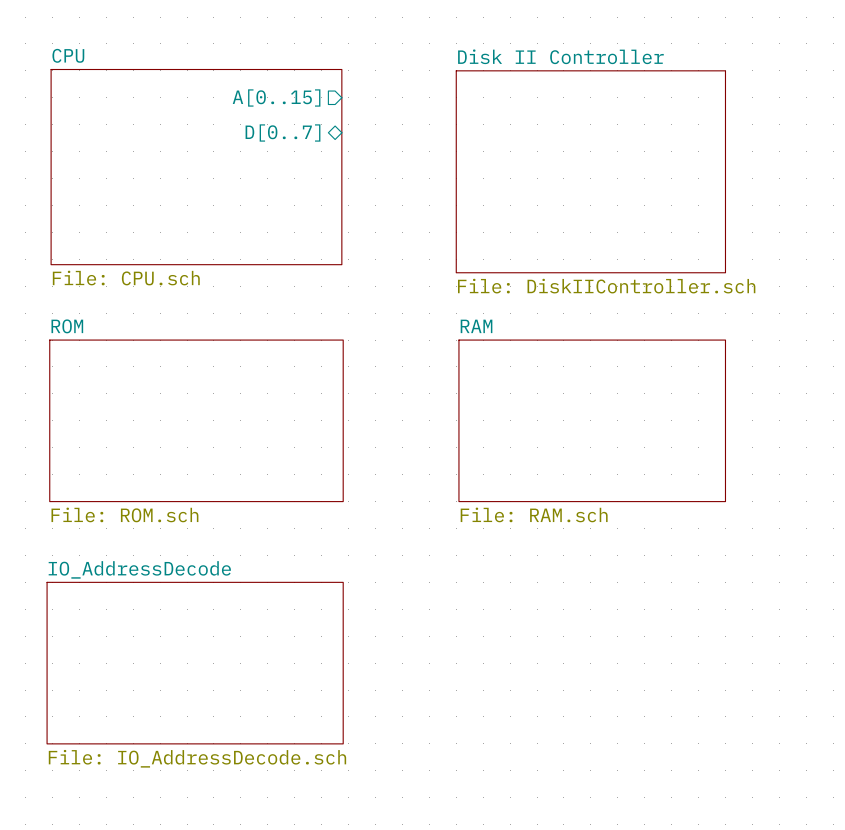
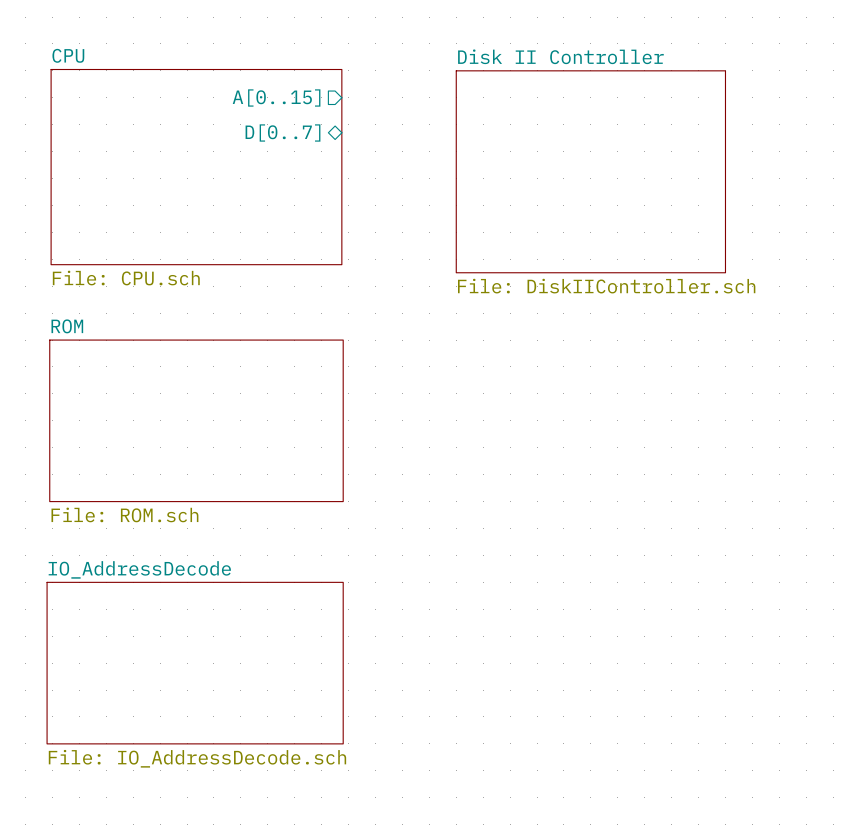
sheet RAM: File: RAM.sch (592, 420) -> none

